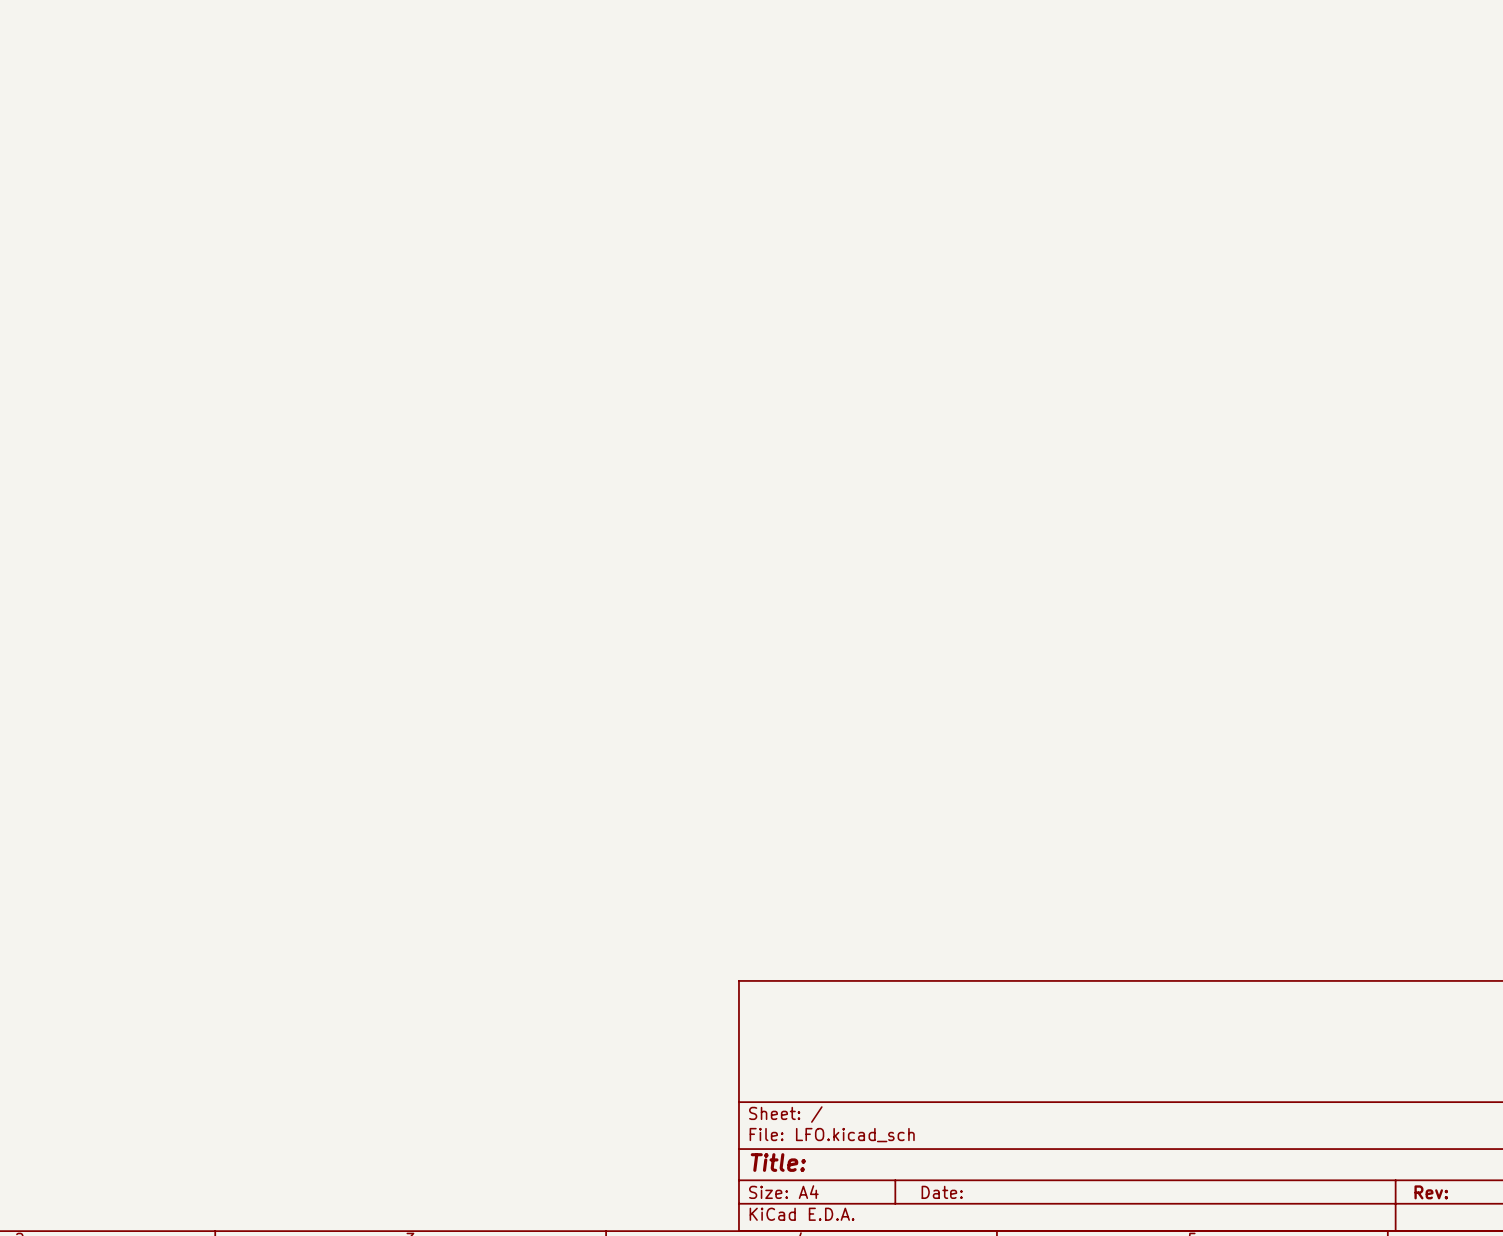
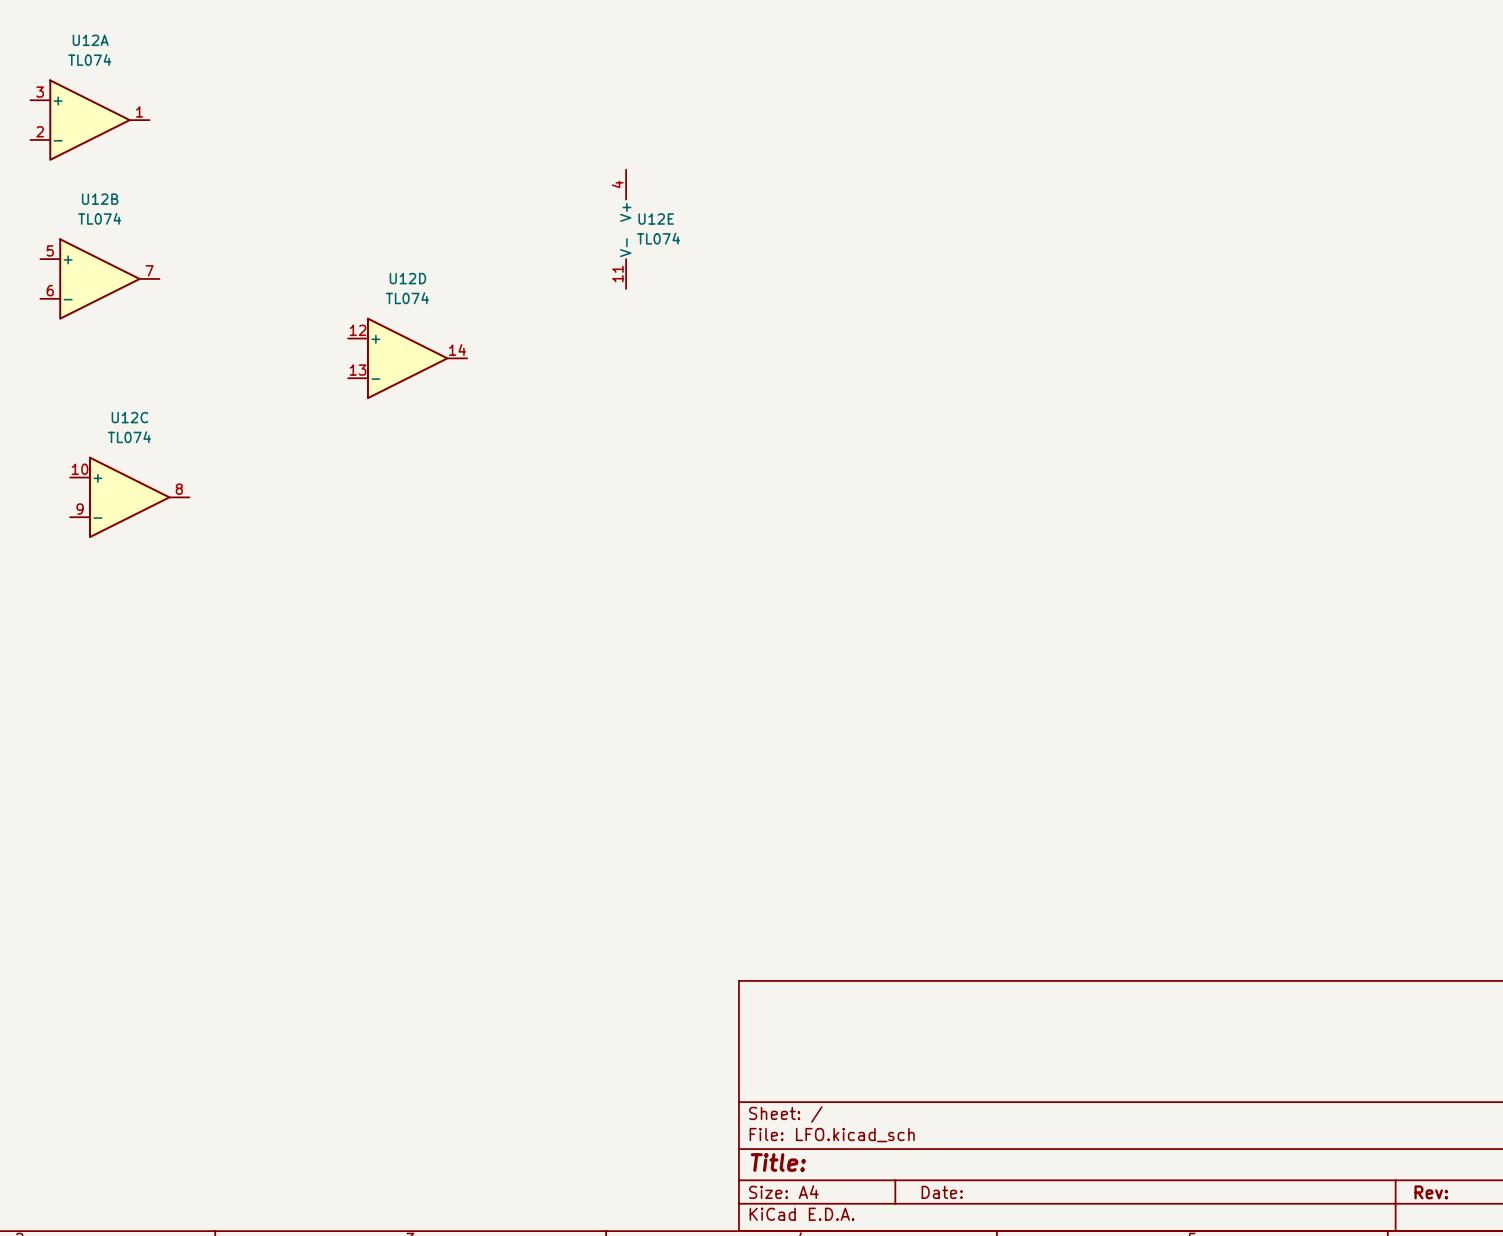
U12A: none -> TL074 (89, 120)
U12E: none -> TL074 (626, 229)
U12B: none -> TL074 (99, 278)
U12D: none -> TL074 (407, 358)
U12C: none -> TL074 (129, 497)

